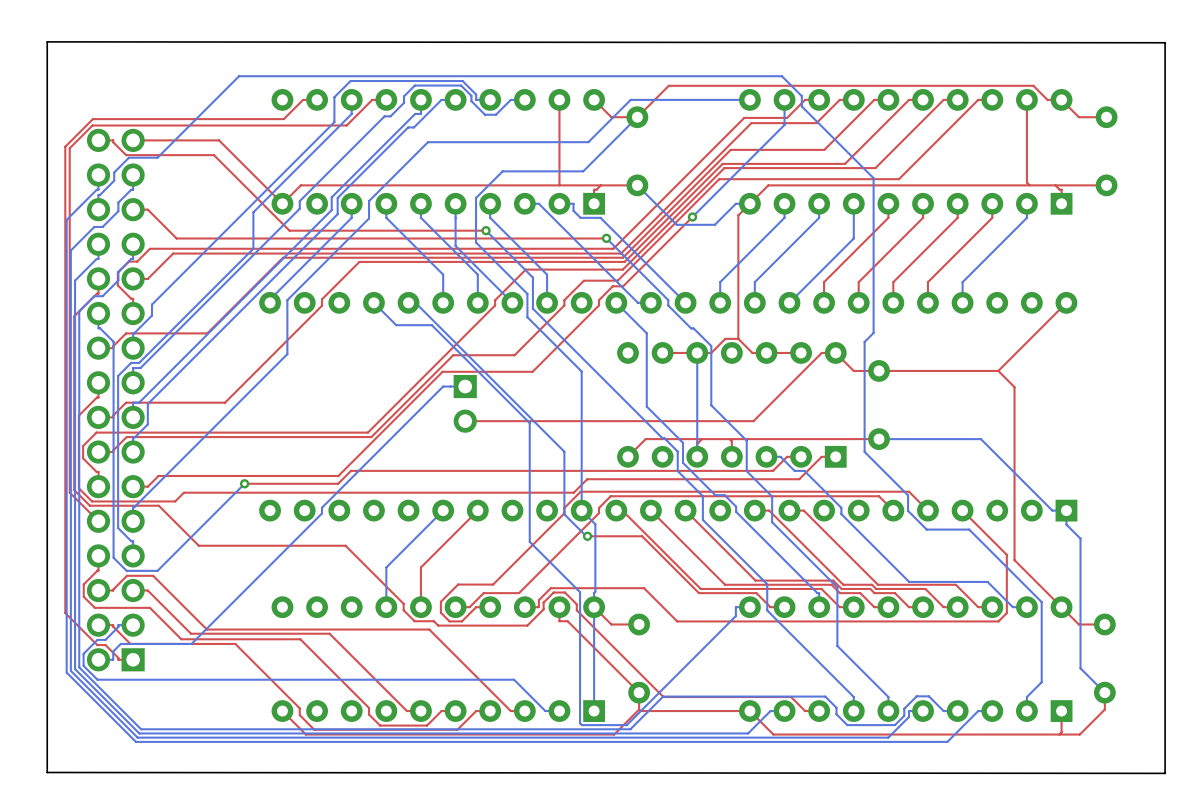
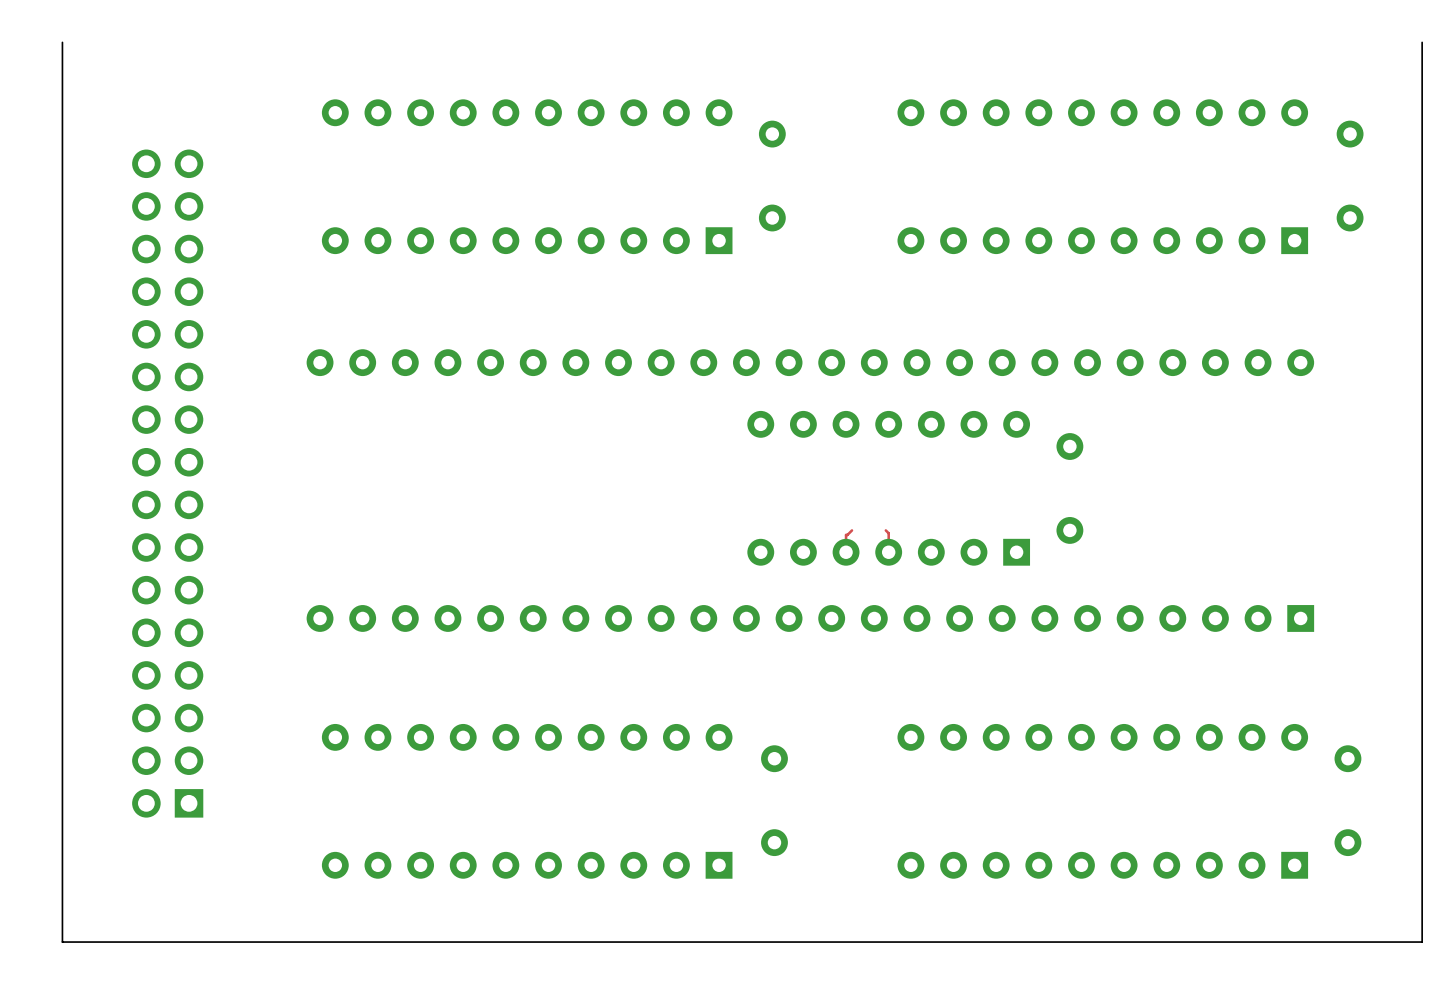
board edge: (1165, 42) (47, 41) (47, 772) (1165, 773) -> (62, 42) (62, 942) (1422, 942)
top track: (317, 99) (303, 99) (283, 119) (92, 119) (65, 146) (65, 613) (97, 645) (105, 645) (118, 659) (133, 659) -> none
bottom track: (351, 99) (351, 113) (253, 212) (253, 248) (139, 362) (131, 362) (118, 376) (118, 528) (133, 541) (133, 555) -> none
top track: (386, 99) (372, 99) (346, 125) (92, 125) (69, 148) (69, 492) (98, 521) -> none
bottom track: (420, 99) (420, 113) (415, 113) (331, 197) (331, 210) (139, 402) (133, 402) (133, 417) -> none
bottom track: (455, 99) (441, 99) (413, 127) (408, 127) (337, 197) (337, 214) (147, 404) (147, 424) (133, 437) (133, 452) -> none
bottom track: (490, 99) (476, 99) (476, 94) (462, 81) (350, 81) (334, 97) (334, 122) (152, 304) (152, 315) (133, 333) (133, 348) -> none
bottom track: (524, 99) (510, 99) (495, 114) (485, 114) (471, 101) (471, 95) (461, 85) (414, 85) (403, 96) (403, 102) (390, 116) (384, 116) (299, 201) (299, 208) (140, 368) (133, 368) (133, 382) -> none
top track: (559, 99) (559, 185) -> none
top track: (594, 99) (611, 117) (637, 117) (668, 85) (1033, 85) (1047, 99) (1061, 99) (1078, 117) (1106, 117) -> none
bottom track: (749, 99) (630, 99) (588, 142) (427, 142) (369, 201) (369, 218) (287, 300) (287, 354) (133, 506) (133, 521) -> none
bottom track: (784, 99) (784, 124) (692, 217) -> none
top track: (819, 99) (805, 99) (787, 117) (744, 117) (613, 248) (149, 248) (137, 261) (128, 261) (117, 272) (117, 285) (133, 298) (133, 313) -> none
top track: (853, 99) (839, 99) (816, 123) (751, 123) (621, 253) (173, 253) (147, 278) (133, 278) -> none
top track: (888, 99) (874, 99) (824, 149) (730, 149) (622, 257) (283, 257) (207, 333) (126, 333) (113, 348) (98, 348) -> none
top track: (923, 99) (909, 99) (844, 163) (722, 163) (624, 261) (359, 261) (321, 299) (321, 305) (225, 402) (126, 402) (113, 417) (98, 417) -> none
top track: (957, 99) (943, 99) (875, 168) (724, 168) (622, 269) (525, 269) (495, 300) (495, 305) (367, 432) (96, 432) (83, 446) (83, 458) (98, 471) (98, 486) -> none
top track: (992, 99) (978, 99) (898, 179) (719, 179) (617, 280) (583, 280) (564, 300) (564, 305) (514, 355) (453, 355) (371, 437) (126, 437) (113, 452) (98, 452) -> none
top track: (1026, 99) (1026, 182) (1029, 185) -> none
bottom track: (637, 117) (583, 171) (502, 171) (476, 198) (476, 242) (527, 293) (527, 317) (581, 371) (581, 510) (595, 524) (594, 711) -> none
top track: (98, 140) (113, 140) (126, 155) (213, 155) (289, 230) (486, 230) -> none
top track: (133, 140) (219, 140) (282, 203) (300, 185) (637, 185) -> none
bottom track: (98, 175) (98, 189) (66, 219) (66, 672) (136, 741) (947, 741) (978, 711) (992, 711) -> none
bottom track: (133, 175) (133, 189) (118, 202) (118, 211) (102, 226) (94, 226) (70, 250) (70, 670) (137, 737) (888, 737) (909, 716) (909, 711) (923, 711) -> none
top track: (600, 185) (594, 189) (594, 203) -> none
bottom track: (637, 185) (676, 224) (714, 224) (735, 203) (749, 203) -> none
top track: (1055, 185) (1061, 189) (1061, 203) -> none
top track: (1106, 185) (768, 185) (738, 215) (738, 338) -> none
bottom track: (351, 203) (351, 217) (270, 299) (270, 302) -> none
bottom track: (386, 203) (386, 217) (443, 274) (443, 302) -> none
bottom track: (420, 203) (420, 217) (477, 274) (477, 302) -> none
bottom track: (455, 203) (455, 246) (512, 302) -> none
bottom track: (490, 203) (490, 217) (547, 274) (547, 302) -> none
bottom track: (524, 203) (538, 203) (637, 302) (650, 302) -> none
bottom track: (559, 203) (573, 203) (573, 210) (580, 217) (600, 217) (685, 302) -> none
bottom track: (784, 203) (784, 217) (720, 282) (720, 302) -> none
bottom track: (819, 203) (819, 217) (754, 282) (754, 302) -> none
bottom track: (853, 203) (853, 238) (789, 302) -> none
top track: (888, 203) (888, 217) (824, 282) (824, 302) -> none
top track: (923, 203) (923, 217) (858, 282) (858, 302) -> none
top track: (957, 203) (957, 217) (893, 282) (893, 302) -> none
top track: (992, 203) (992, 217) (927, 282) (927, 302) -> none
bottom track: (1026, 203) (1026, 217) (962, 282) (962, 302) -> none
bottom track: (98, 209) (98, 194) (114, 180) (114, 172) (128, 157) (157, 157) (239, 76) (781, 76) (801, 96) (801, 106) (873, 178) (873, 332) (864, 341) (864, 451) (908, 495) (908, 510) (926, 529) (969, 529) (1041, 602) (1041, 682) (1026, 697) (1026, 711) -> none
top track: (133, 209) (147, 209) (176, 238) (606, 238) -> none
top track: (692, 217) (623, 286) (612, 286) (599, 300) (599, 305) (532, 371) (442, 371) (338, 475) (158, 475) (147, 486) (133, 486) -> none
via: (692, 217) -> none
bottom track: (486, 230) (532, 277) (532, 308) (677, 451) (677, 471) (702, 496) (702, 519) (767, 584) (767, 610) (853, 697) (853, 711) -> none
via: (486, 230) -> none
bottom track: (606, 238) (668, 300) (668, 305) (711, 346) (711, 405) (746, 440) (746, 471) (772, 496) (772, 522) (837, 587) (837, 645) (888, 697) (888, 711) -> none
via: (606, 238) -> none
bottom track: (98, 244) (98, 259) (75, 280) (75, 669) (139, 733) (748, 733) (770, 711) (784, 711) -> none
bottom track: (133, 244) (133, 259) (118, 271) (118, 280) (102, 296) (94, 296) (79, 311) (79, 667) (141, 729) (630, 729) (663, 696) (825, 696) (836, 707) (836, 714) (847, 725) (894, 725) (904, 715) (904, 708) (916, 696) (928, 696) (943, 711) (957, 711) -> none
top track: (98, 278) (98, 293) (74, 316) (74, 489) (89, 505) (158, 505) (198, 545) (345, 545) (403, 603) (403, 610) (414, 621) (433, 621) (438, 625) (527, 625) (543, 609) (543, 602) (553, 592) (564, 592) (576, 604) (576, 610) (663, 697) (791, 697) (805, 711) (819, 711) -> none
bottom track: (373, 302) (396, 325) (431, 325) (529, 423) (529, 541) (580, 592) (580, 723) (581, 725) (626, 725) (735, 616) (735, 607) (749, 607) -> none
bottom track: (408, 302) (415, 302) (564, 451) (564, 514) (587, 536) -> none
bottom track: (616, 302) (646, 333) (646, 406) (683, 442) (683, 462) (715, 495) (724, 495) (736, 506) (736, 511) (819, 593) (819, 607) -> none
top track: (1066, 302) (998, 370) -> none
bottom track: (98, 313) (98, 328) (113, 341) (113, 557) (126, 570) (157, 570) (244, 483) -> none
top track: (738, 338) (752, 352) (801, 352) -> none
top track: (738, 338) (725, 338) (711, 352) (662, 352) -> none
bottom track: (697, 352) (697, 456) -> none
top track: (998, 370) (853, 370) (835, 352) (821, 352) (753, 421) (465, 421) -> none
top track: (998, 370) (1014, 387) (1014, 560) (1078, 624) (1104, 624) -> none
top track: (98, 382) (98, 397) (78, 415) (78, 488) (92, 501) (175, 501) (183, 492) (573, 492) (587, 479) (799, 479) (821, 456) (835, 456) -> none
bottom track: (465, 386) (443, 386) (321, 507) (321, 513) (191, 643) (120, 643) (113, 651) (113, 659) (98, 659) -> none
part position: (115, 400) -> (167, 483)
part: (465, 403) -> none
top track: (879, 439) (645, 439) (627, 456) -> none
bottom track: (879, 439) (980, 439) (1052, 510) (1066, 510) (1066, 524) (1080, 538) (1080, 668) (1104, 692) -> none
bottom track: (766, 456) (780, 456) (794, 470) (804, 470) (841, 507) (841, 514) (909, 581) (987, 581) (1012, 607) (1026, 607) -> none
top track: (801, 456) (787, 456) (773, 470) (351, 470) (338, 483) (244, 483) -> none
via: (244, 483) -> none
bottom track: (443, 510) (386, 567) (386, 607) -> none
top track: (477, 510) (420, 567) (420, 607) -> none
top track: (616, 510) (622, 510) (700, 588) (821, 588) (839, 607) (853, 607) -> none
top track: (650, 510) (725, 584) (831, 584) (839, 593) (860, 593) (874, 607) (888, 607) -> none
top track: (685, 510) (755, 580) (833, 580) (841, 588) (870, 588) (874, 593) (894, 593) (909, 607) (923, 607) -> none
top track: (754, 510) (769, 510) (843, 584) (872, 584) (876, 588) (925, 588) (943, 607) (957, 607) -> none
top track: (789, 510) (803, 510) (878, 584) (955, 584) (978, 607) (992, 607) -> none
top track: (893, 510) (878, 496) (610, 496) (599, 507) (599, 513) (519, 593) (483, 593) (469, 607) (455, 607) -> none
top track: (927, 510) (909, 491) (580, 491) (564, 508) (564, 513) (493, 584) (458, 584) (440, 601) (440, 612) (449, 621) (461, 621) (476, 607) (490, 607) -> none
top track: (962, 510) (1006, 554) (1006, 613) (998, 621) (677, 621) (644, 588) (550, 588) (538, 600) (538, 607) (524, 607) -> none
top track: (587, 536) (642, 536) (698, 593) (756, 593) (770, 607) (784, 607) -> none
via: (587, 536) -> none
top track: (98, 555) (98, 570) (83, 584) (83, 596) (94, 607) (149, 607) (181, 639) (300, 639) (369, 707) (369, 714) (380, 725) (427, 725) (441, 711) (455, 711) -> none
top track: (98, 590) (113, 590) (127, 575) (153, 575) (206, 629) (429, 629) (510, 711) (524, 711) -> none
top track: (133, 590) (147, 590) (191, 633) (329, 633) (406, 711) (420, 711) -> none
top track: (559, 607) (559, 621) (567, 621) (639, 692) (639, 709) -> none
top track: (594, 607) (611, 624) (639, 624) -> none
top track: (98, 625) (113, 625) (130, 643) (235, 643) (299, 708) (299, 715) (314, 729) (457, 729) (476, 711) (490, 711) -> none
bottom track: (133, 625) (118, 625) (105, 639) (97, 639) (83, 653) (83, 665) (97, 679) (514, 679) (545, 711) (559, 711) -> none
top track: (1104, 692) (1104, 709) (1079, 734) (773, 734) (749, 711) (639, 709) -> none
top track: (639, 709) (614, 734) (305, 734) (282, 711) -> none
top track: (1061, 711) (1061, 732) (1059, 734) -> none

